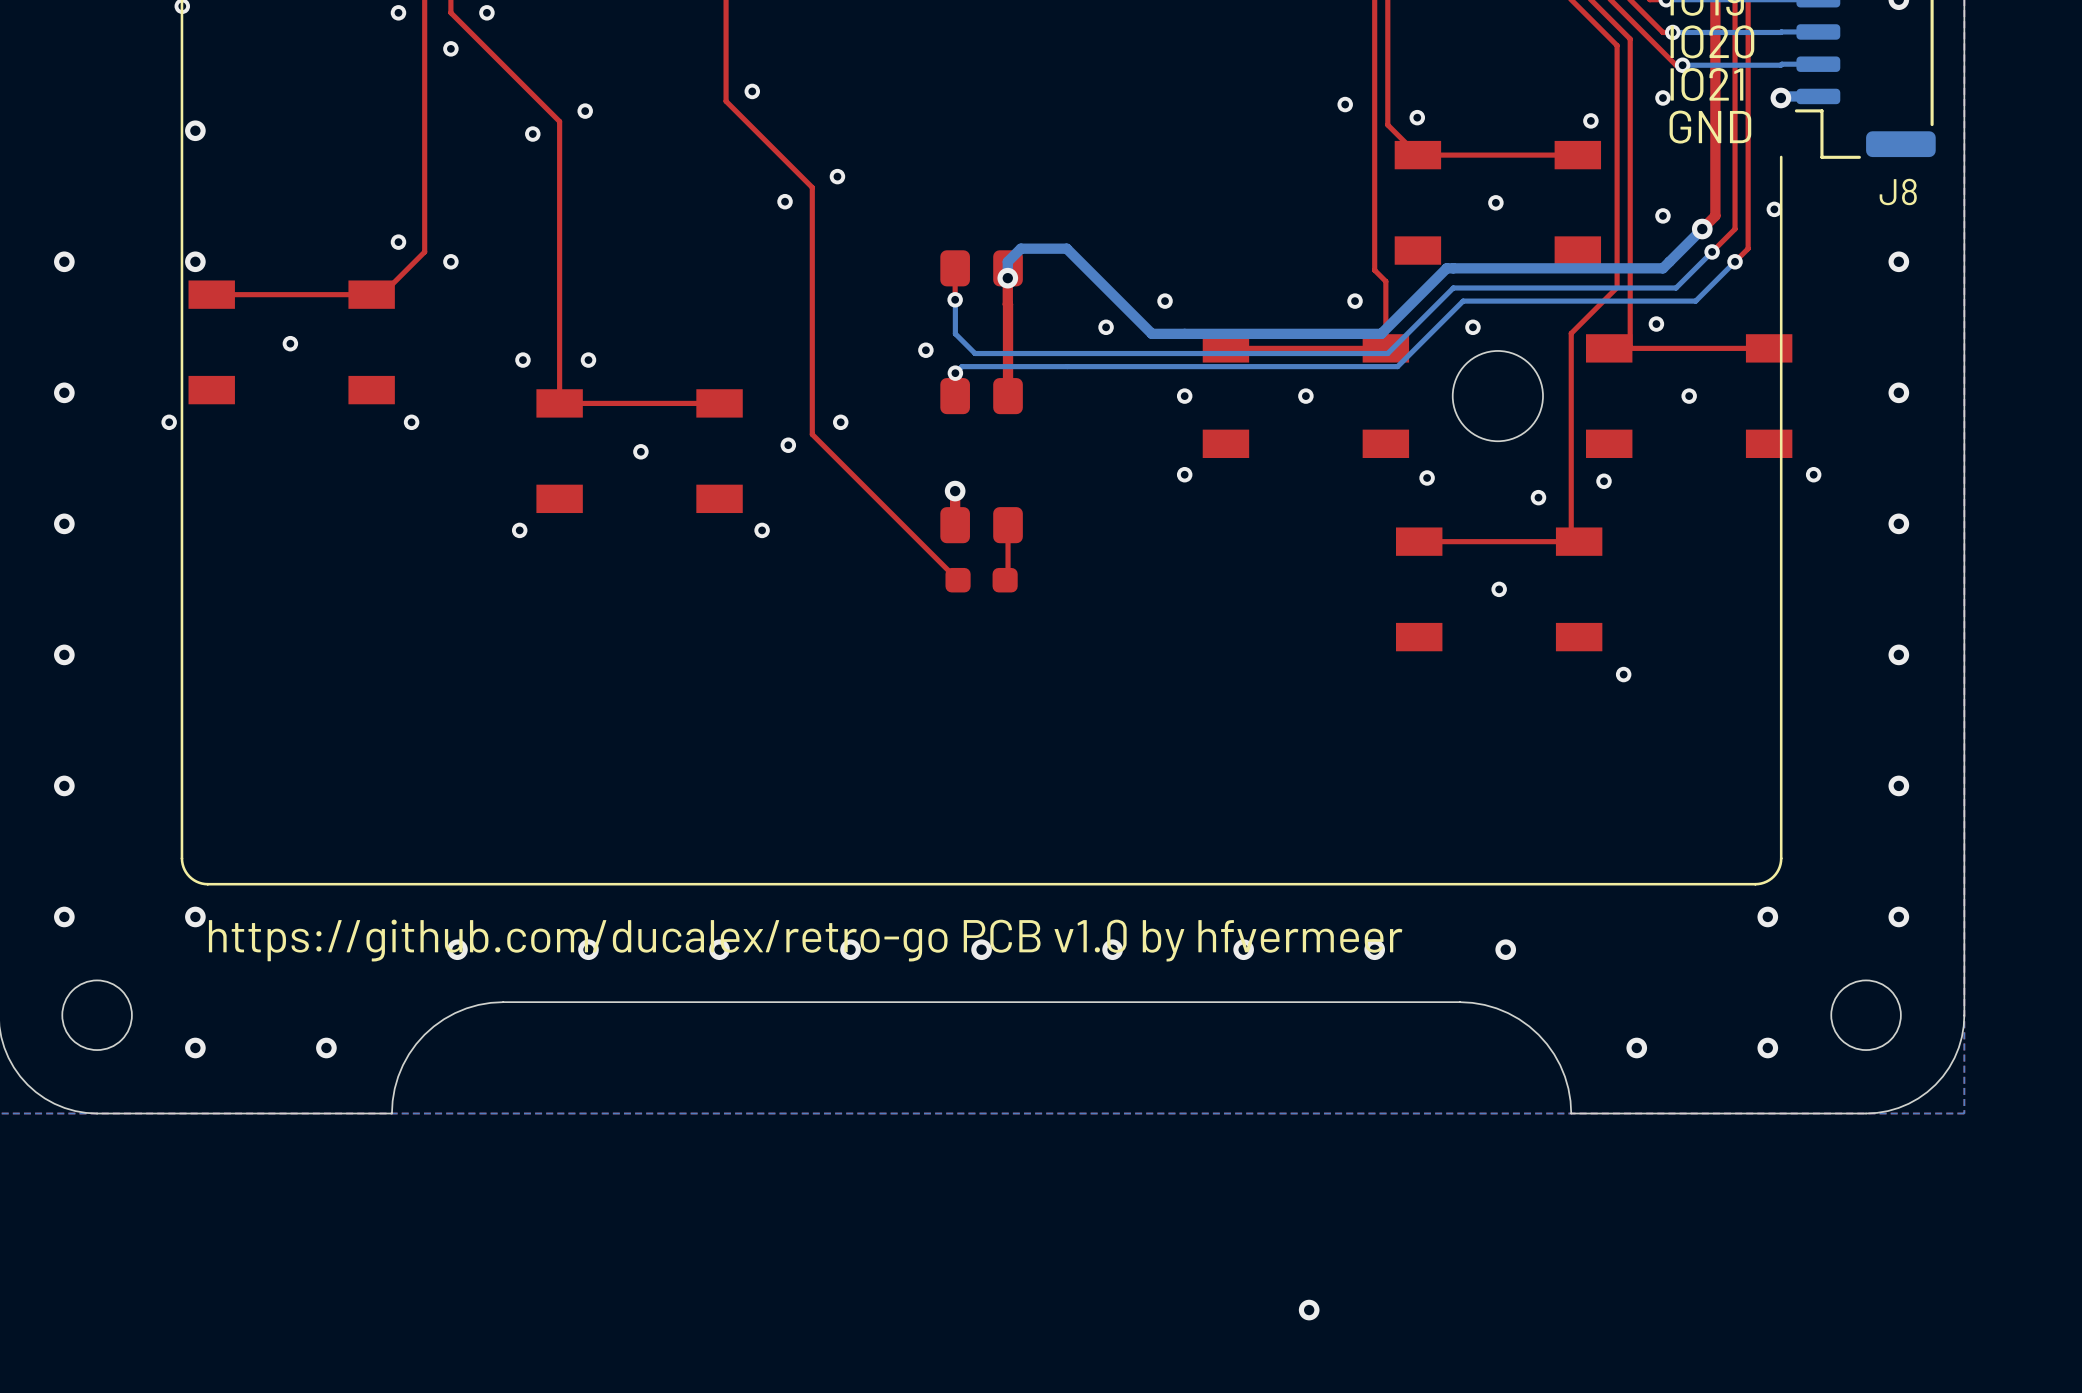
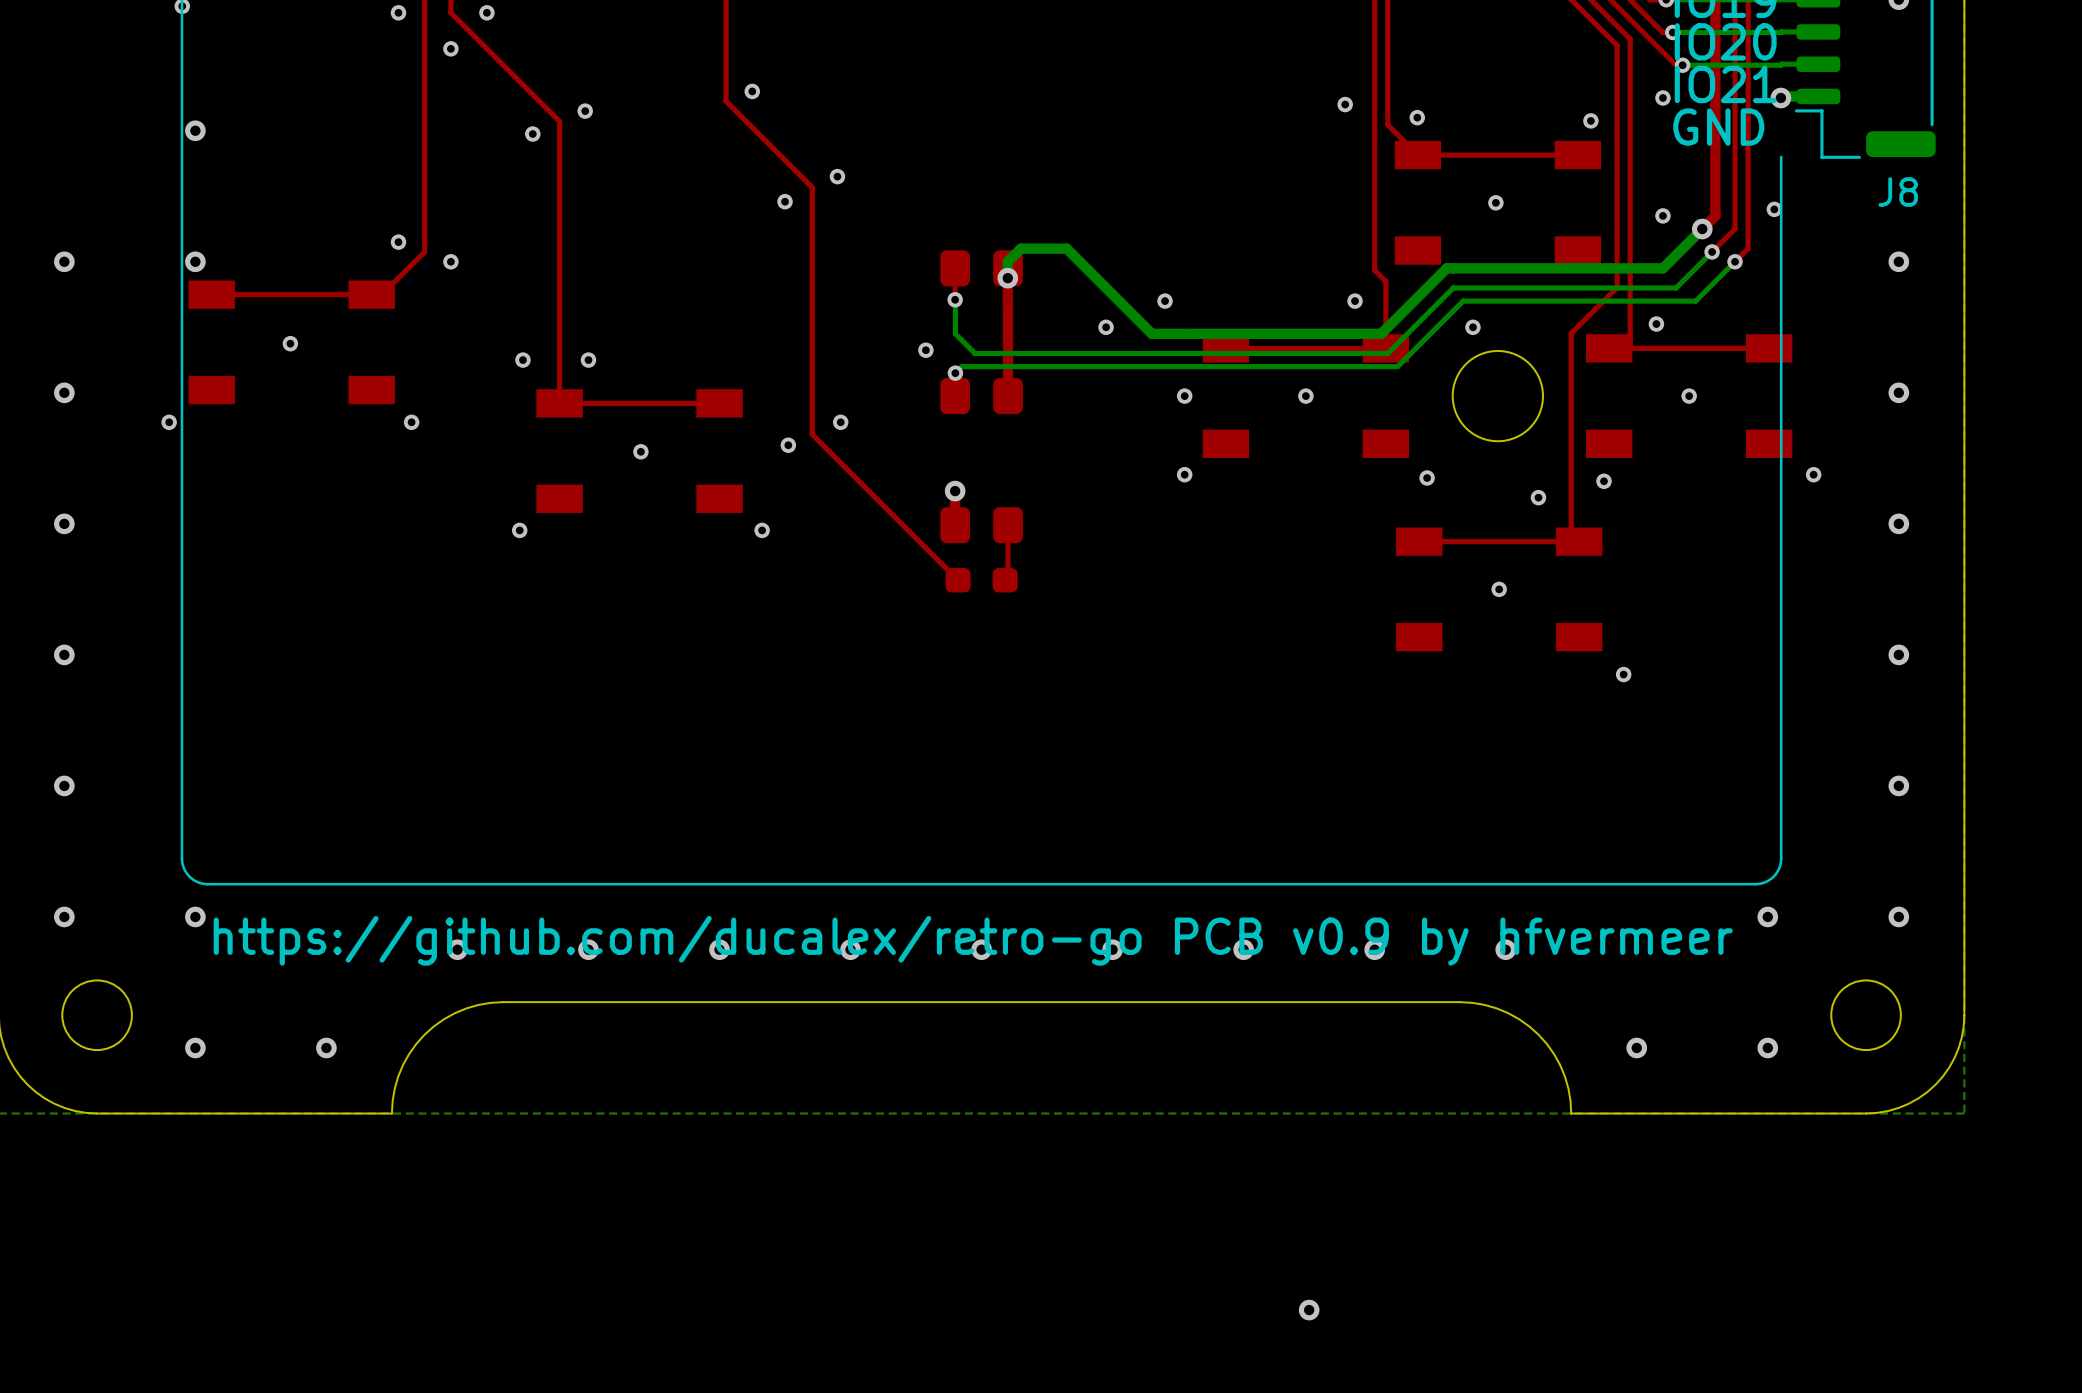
text: https://github.com/ducalex/retro-go PCB v1.0 by hfvermeer (805, 940) -> https://github.com/ducalex/retro-go PCB v0.9 by hfvermeer (973, 940)

